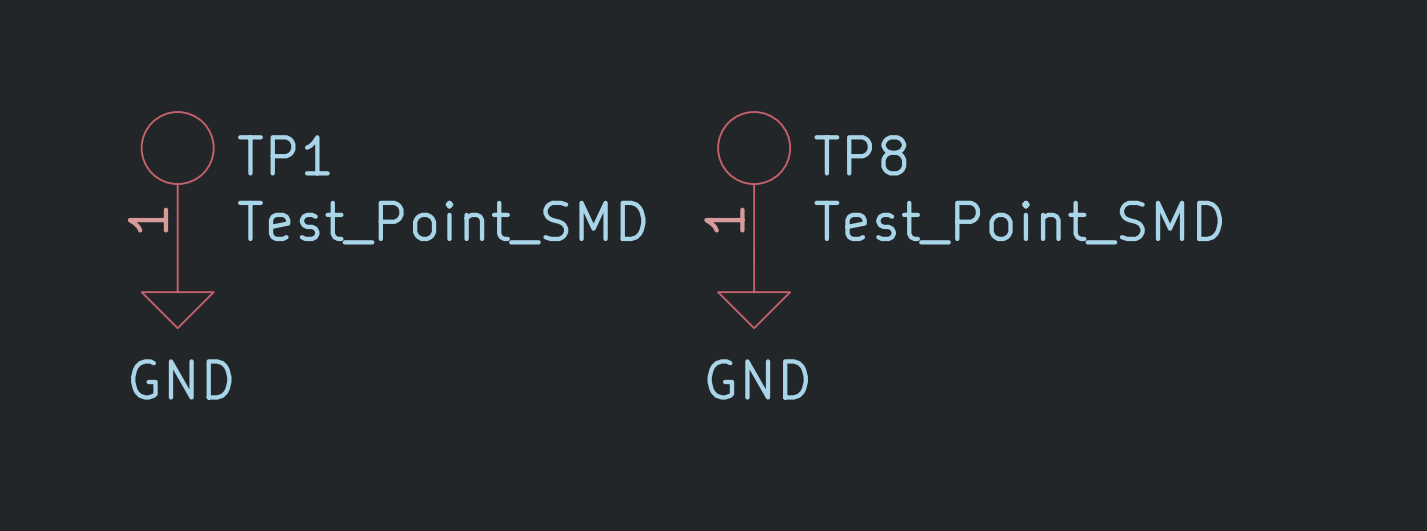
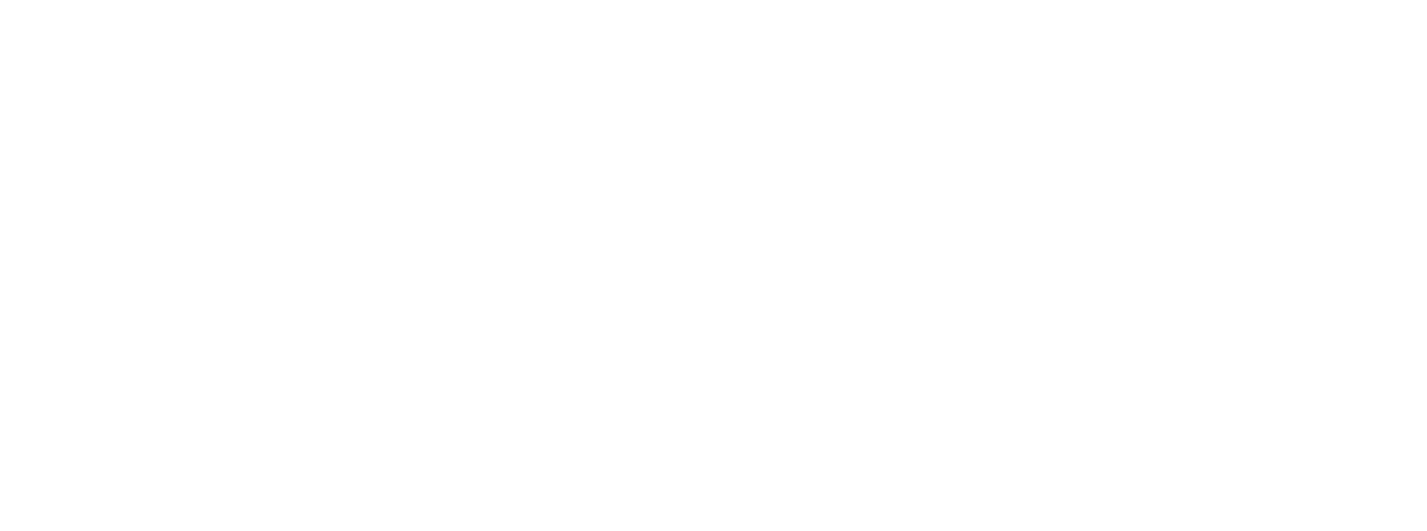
TP1: Test_Point_SMD (177, 184) -> none
TP8: Test_Point_SMD (754, 184) -> none
power symbol: GND (177, 292) -> none
power symbol: GND (754, 292) -> none

